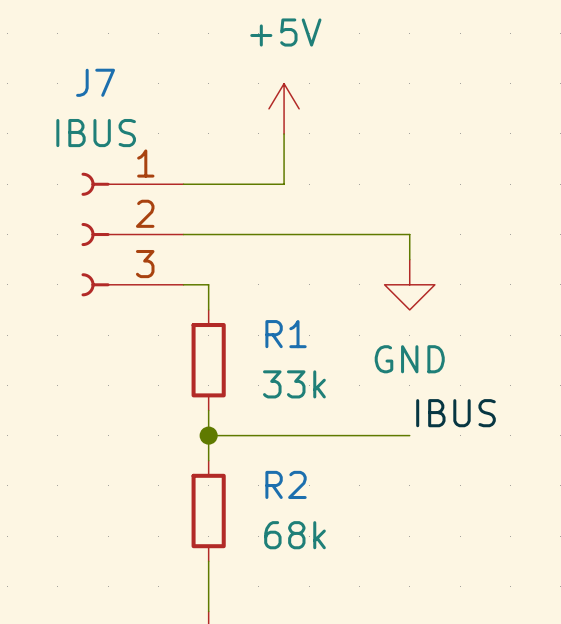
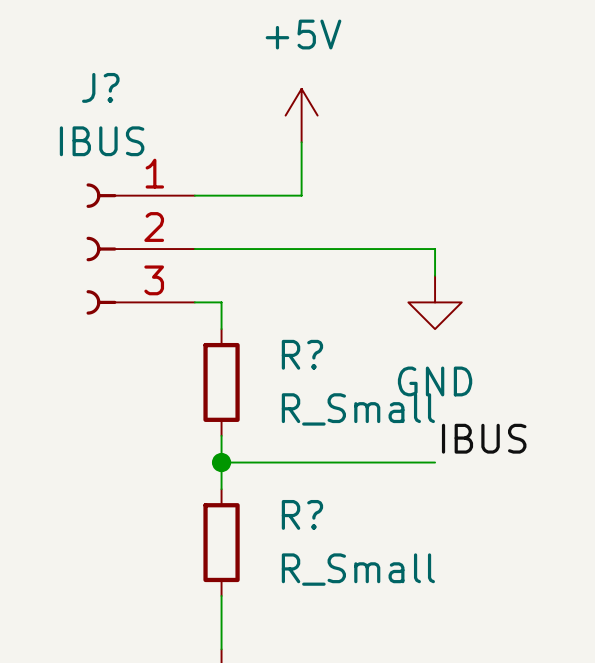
J7 name: J7 (95, 82) -> J? (100, 87)
R1 name: R1 (286, 334) -> R? (302, 354)
R1 value: 33k (294, 384) -> R_Small (358, 409)
R2 name: R2 (286, 484) -> R? (302, 514)
R2 value: 68k (295, 535) -> R_Small (358, 569)

